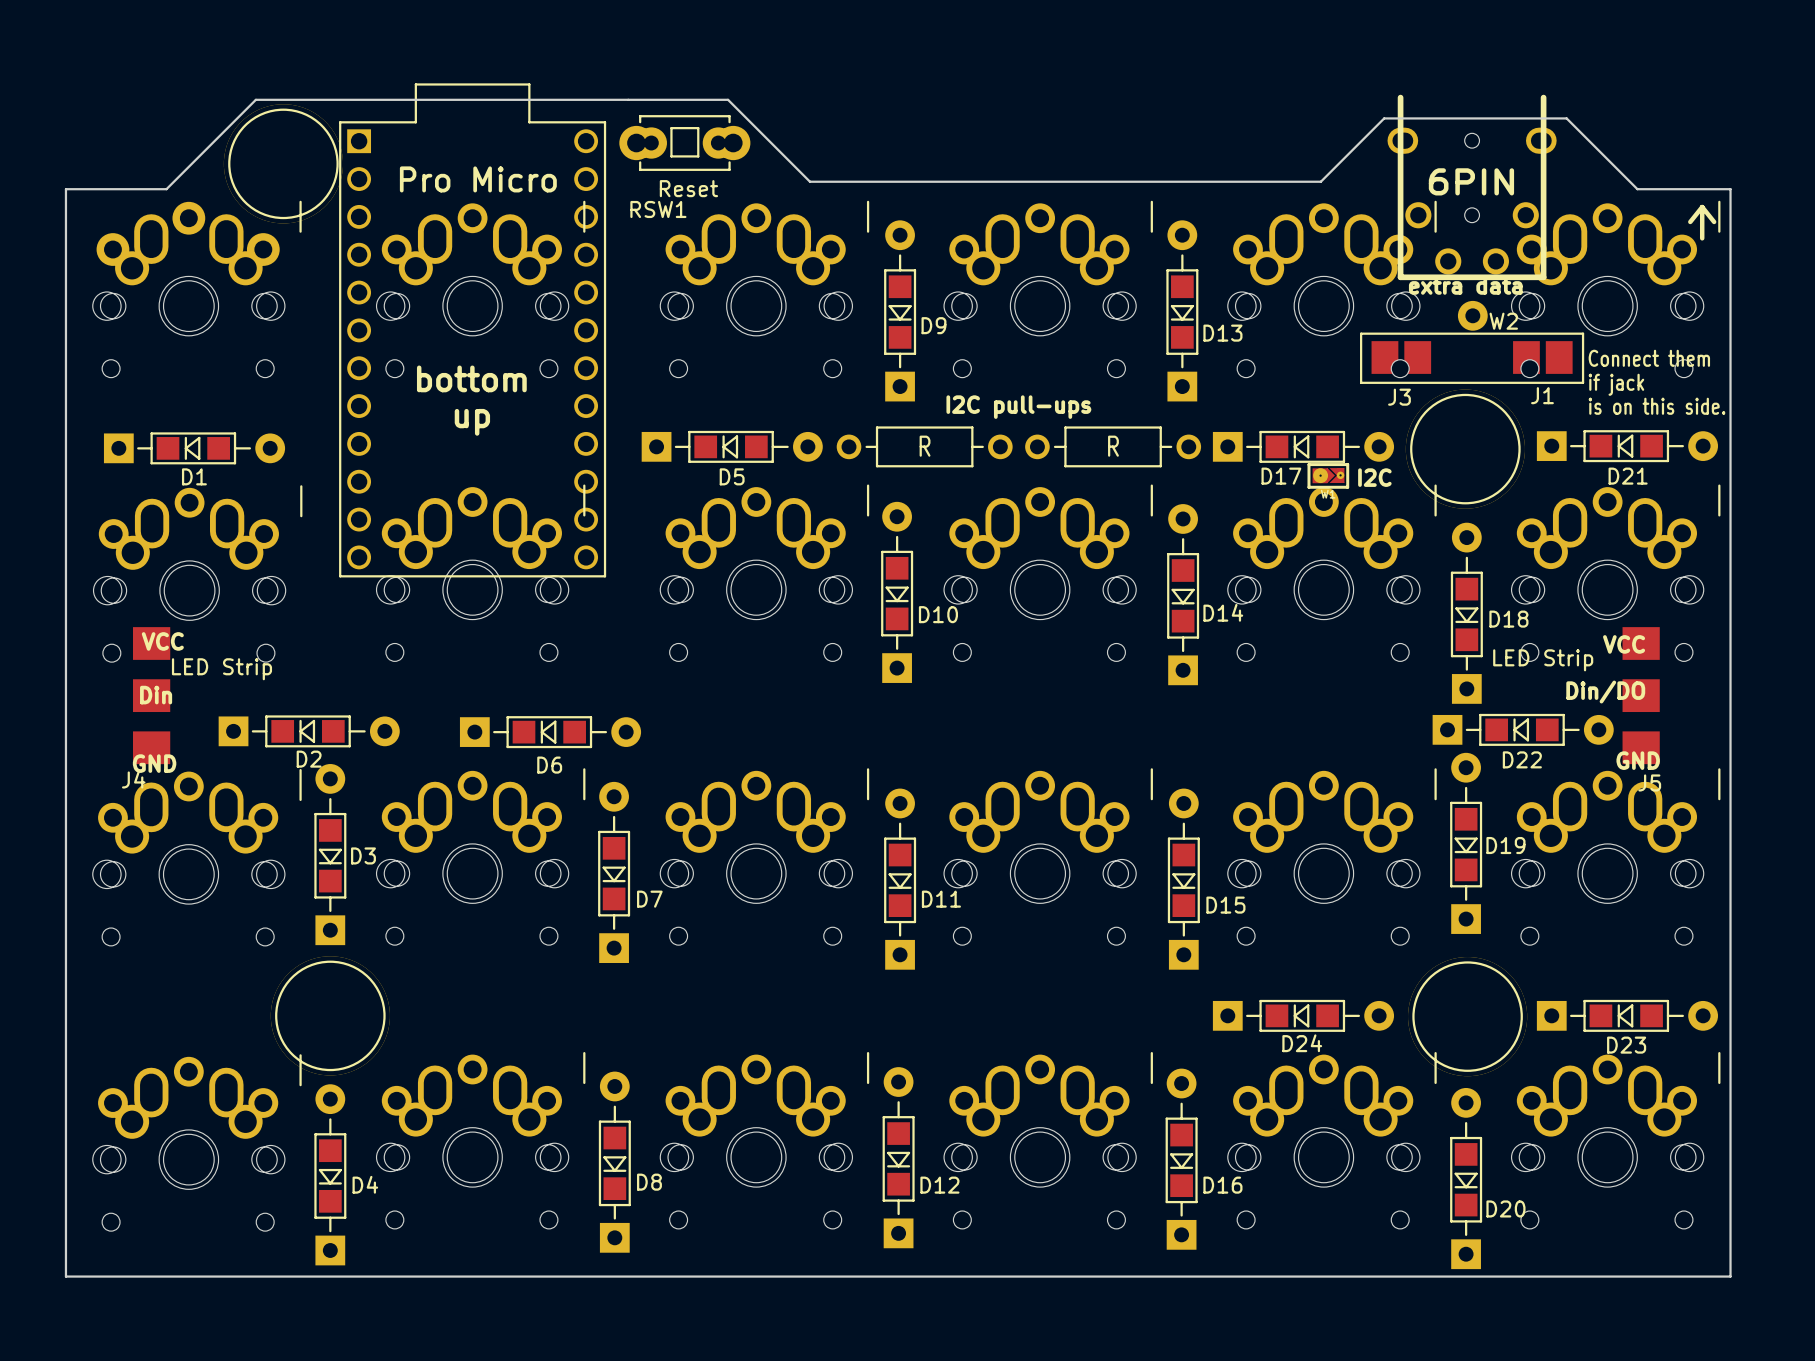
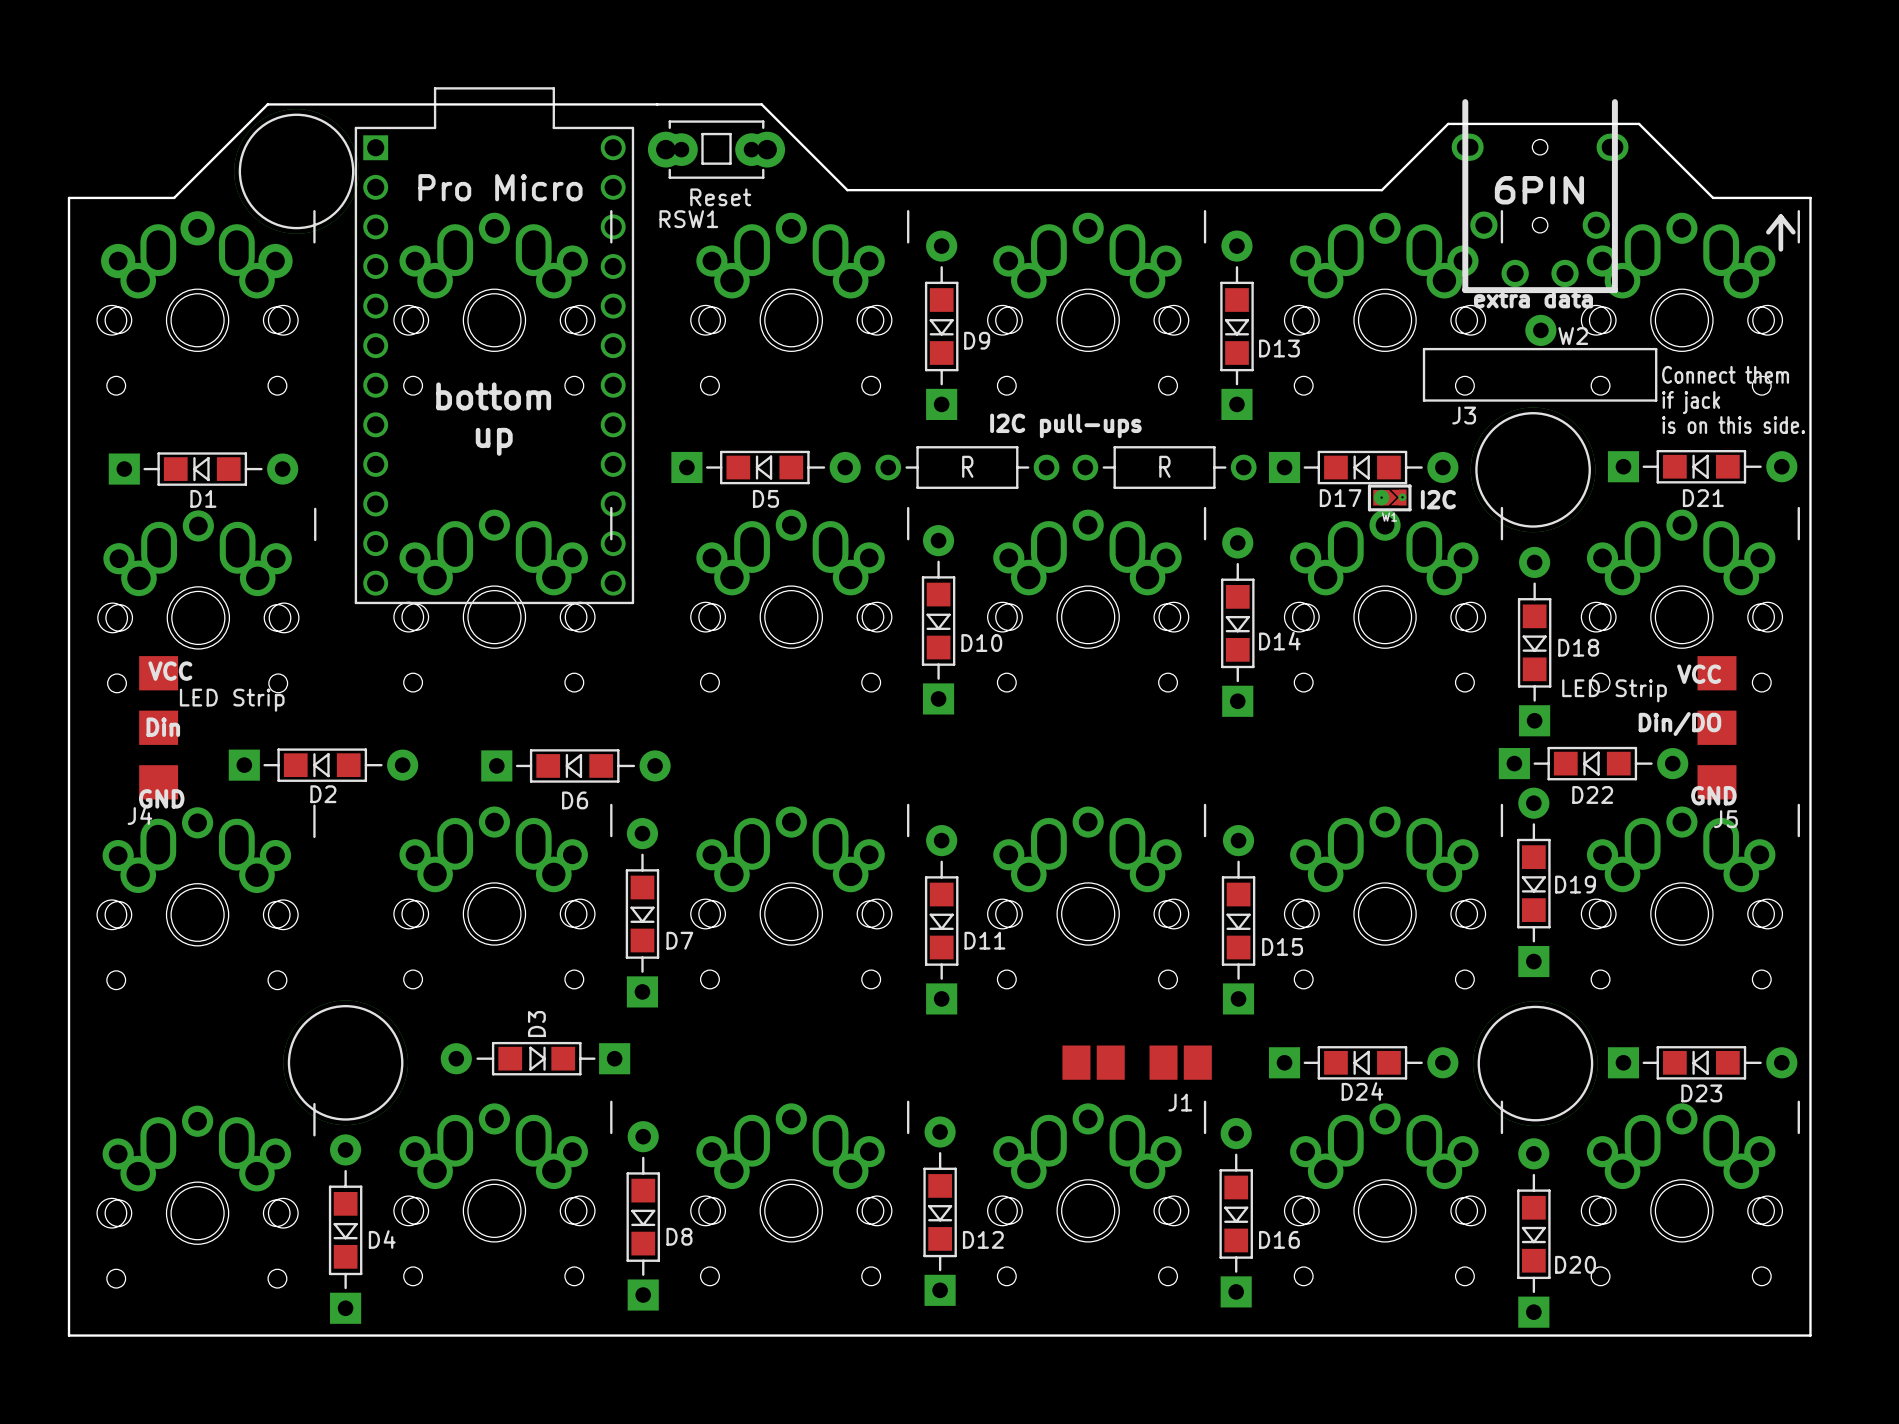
part: (1401, 357) -> none
J1 position: (1542, 357) -> (1180, 1062)
D3 rotation: 0° (330, 854) -> 90° counterclockwise (535, 1058)
D3 position: (330, 854) -> (535, 1058)
part: none -> (1093, 1062)

